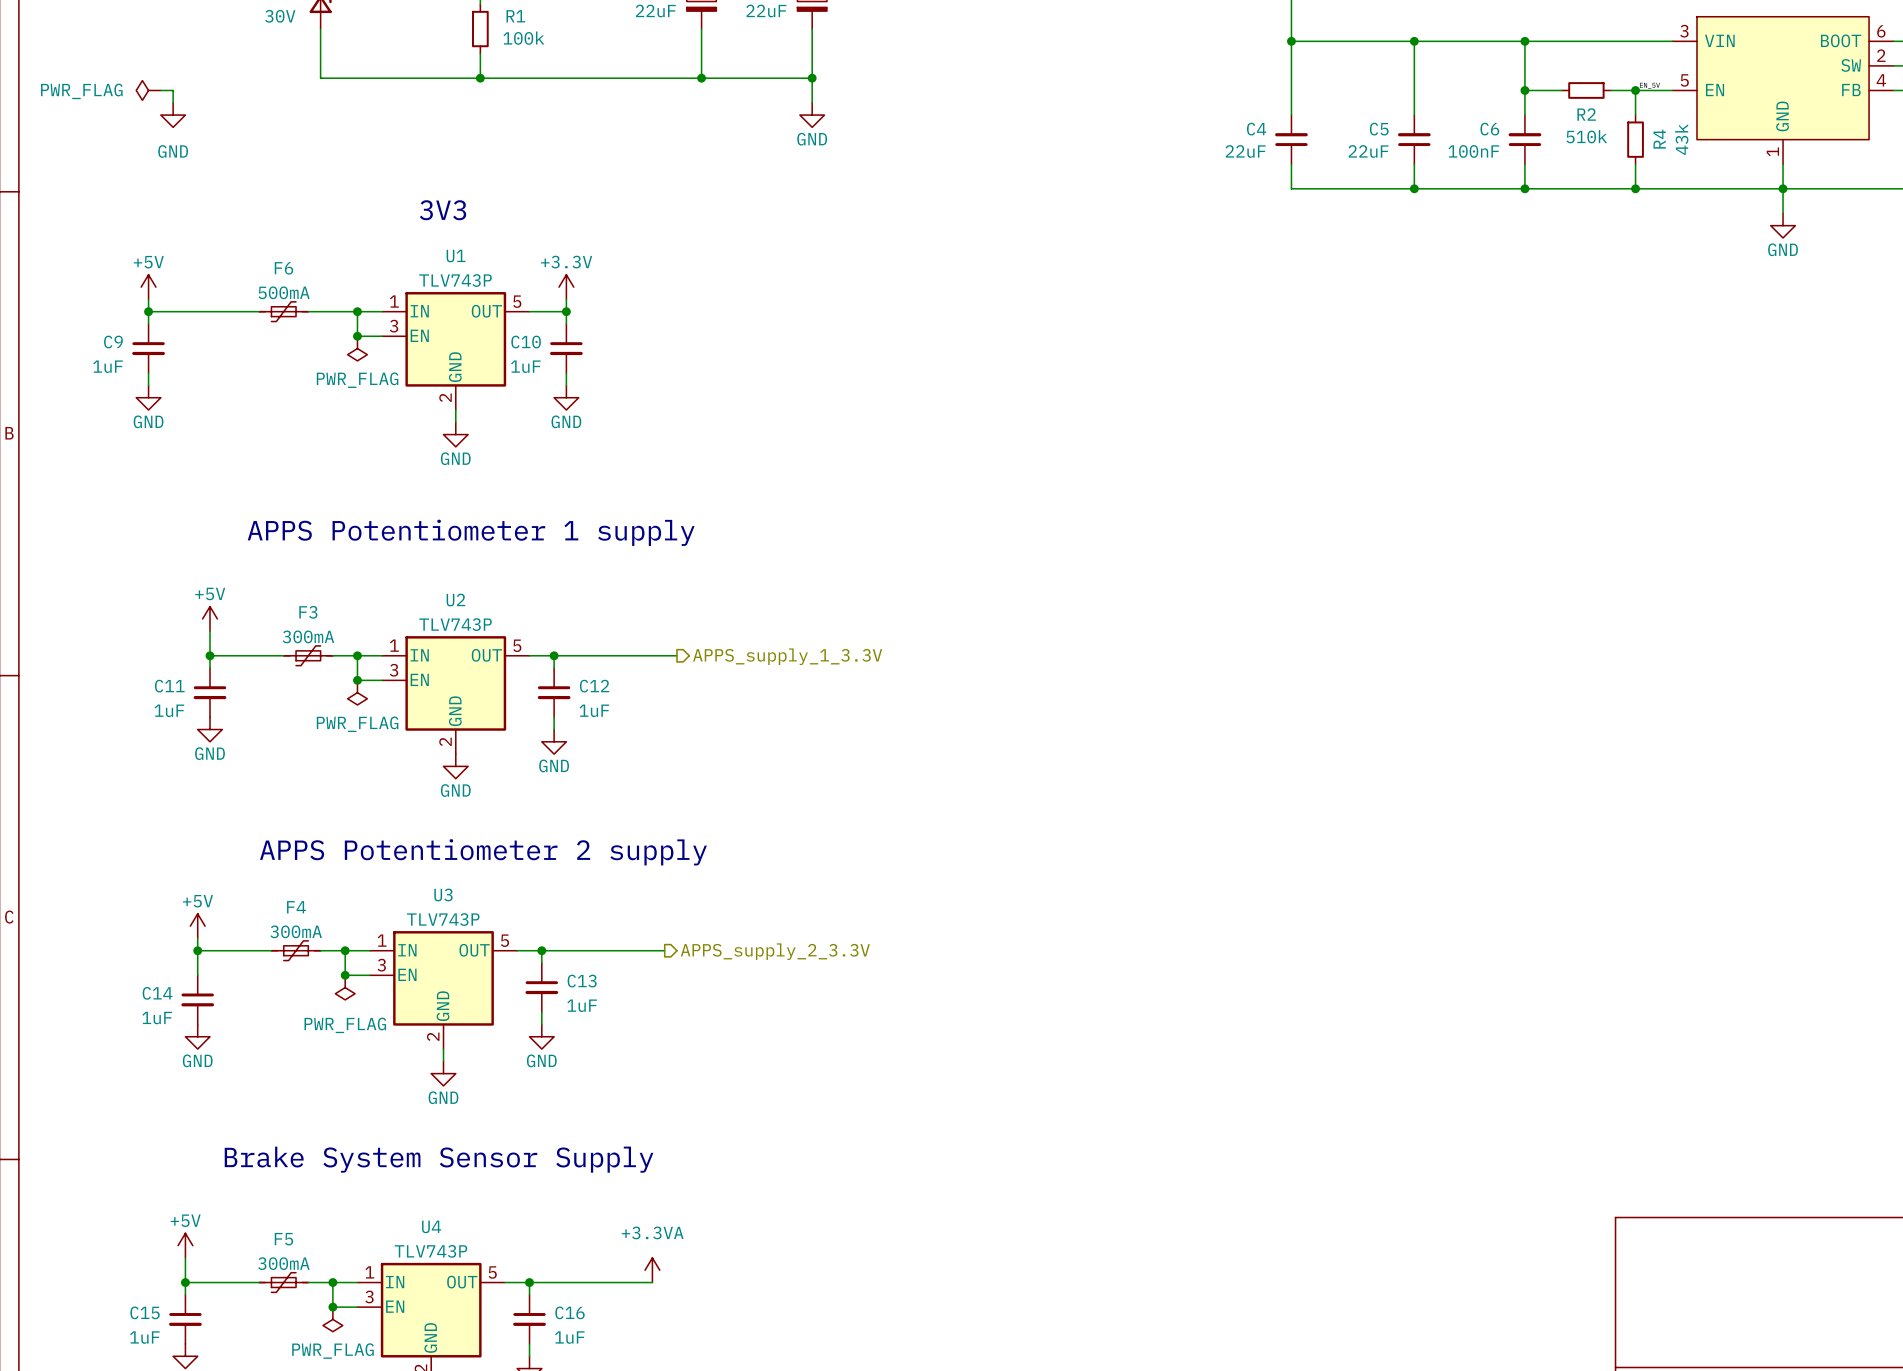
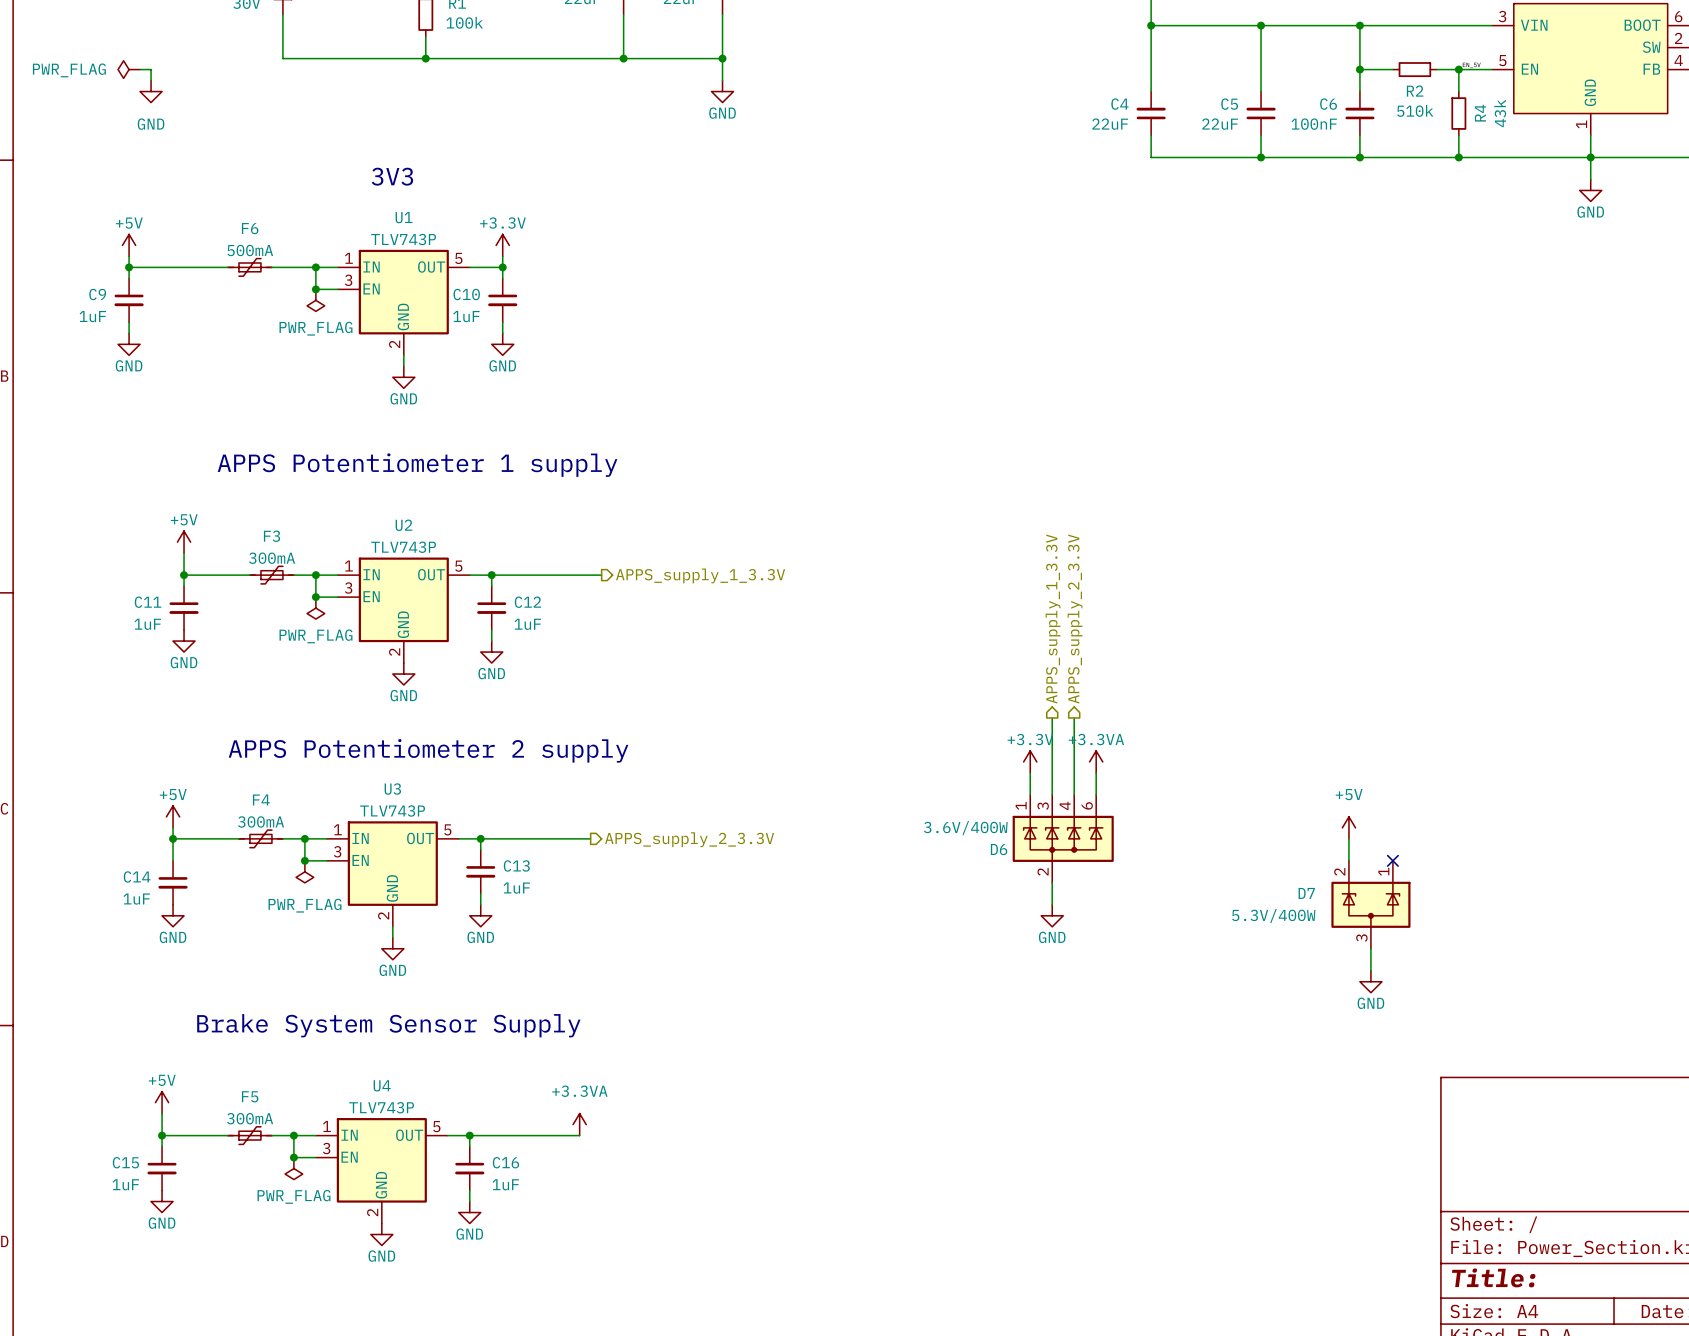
hierarchical label: none -> APPS_supply_1_3.3V (1053, 619)
hierarchical label: none -> APPS_supply_2_3.3V (1075, 619)
wire: none -> (1052, 717) (1052, 794)
wire: none -> (1074, 717) (1074, 794)
power symbol: none -> +3.3V (1030, 761)
power symbol: none -> +3.3VA (1096, 761)
wire: none -> (1030, 772) (1030, 794)
wire: none -> (1096, 772) (1096, 794)
power symbol: none -> +5V (1348, 827)
D6: none -> 3.6V/400W (1063, 838)
wire: none -> (1348, 838) (1348, 860)
no-connect mark: none -> (1392, 860)
wire: none -> (1052, 882) (1052, 904)
D7: none -> 5.3V/400W (1370, 904)
power symbol: none -> GND (1052, 915)
wire: none -> (1370, 948) (1370, 970)
power symbol: none -> GND (1370, 981)

